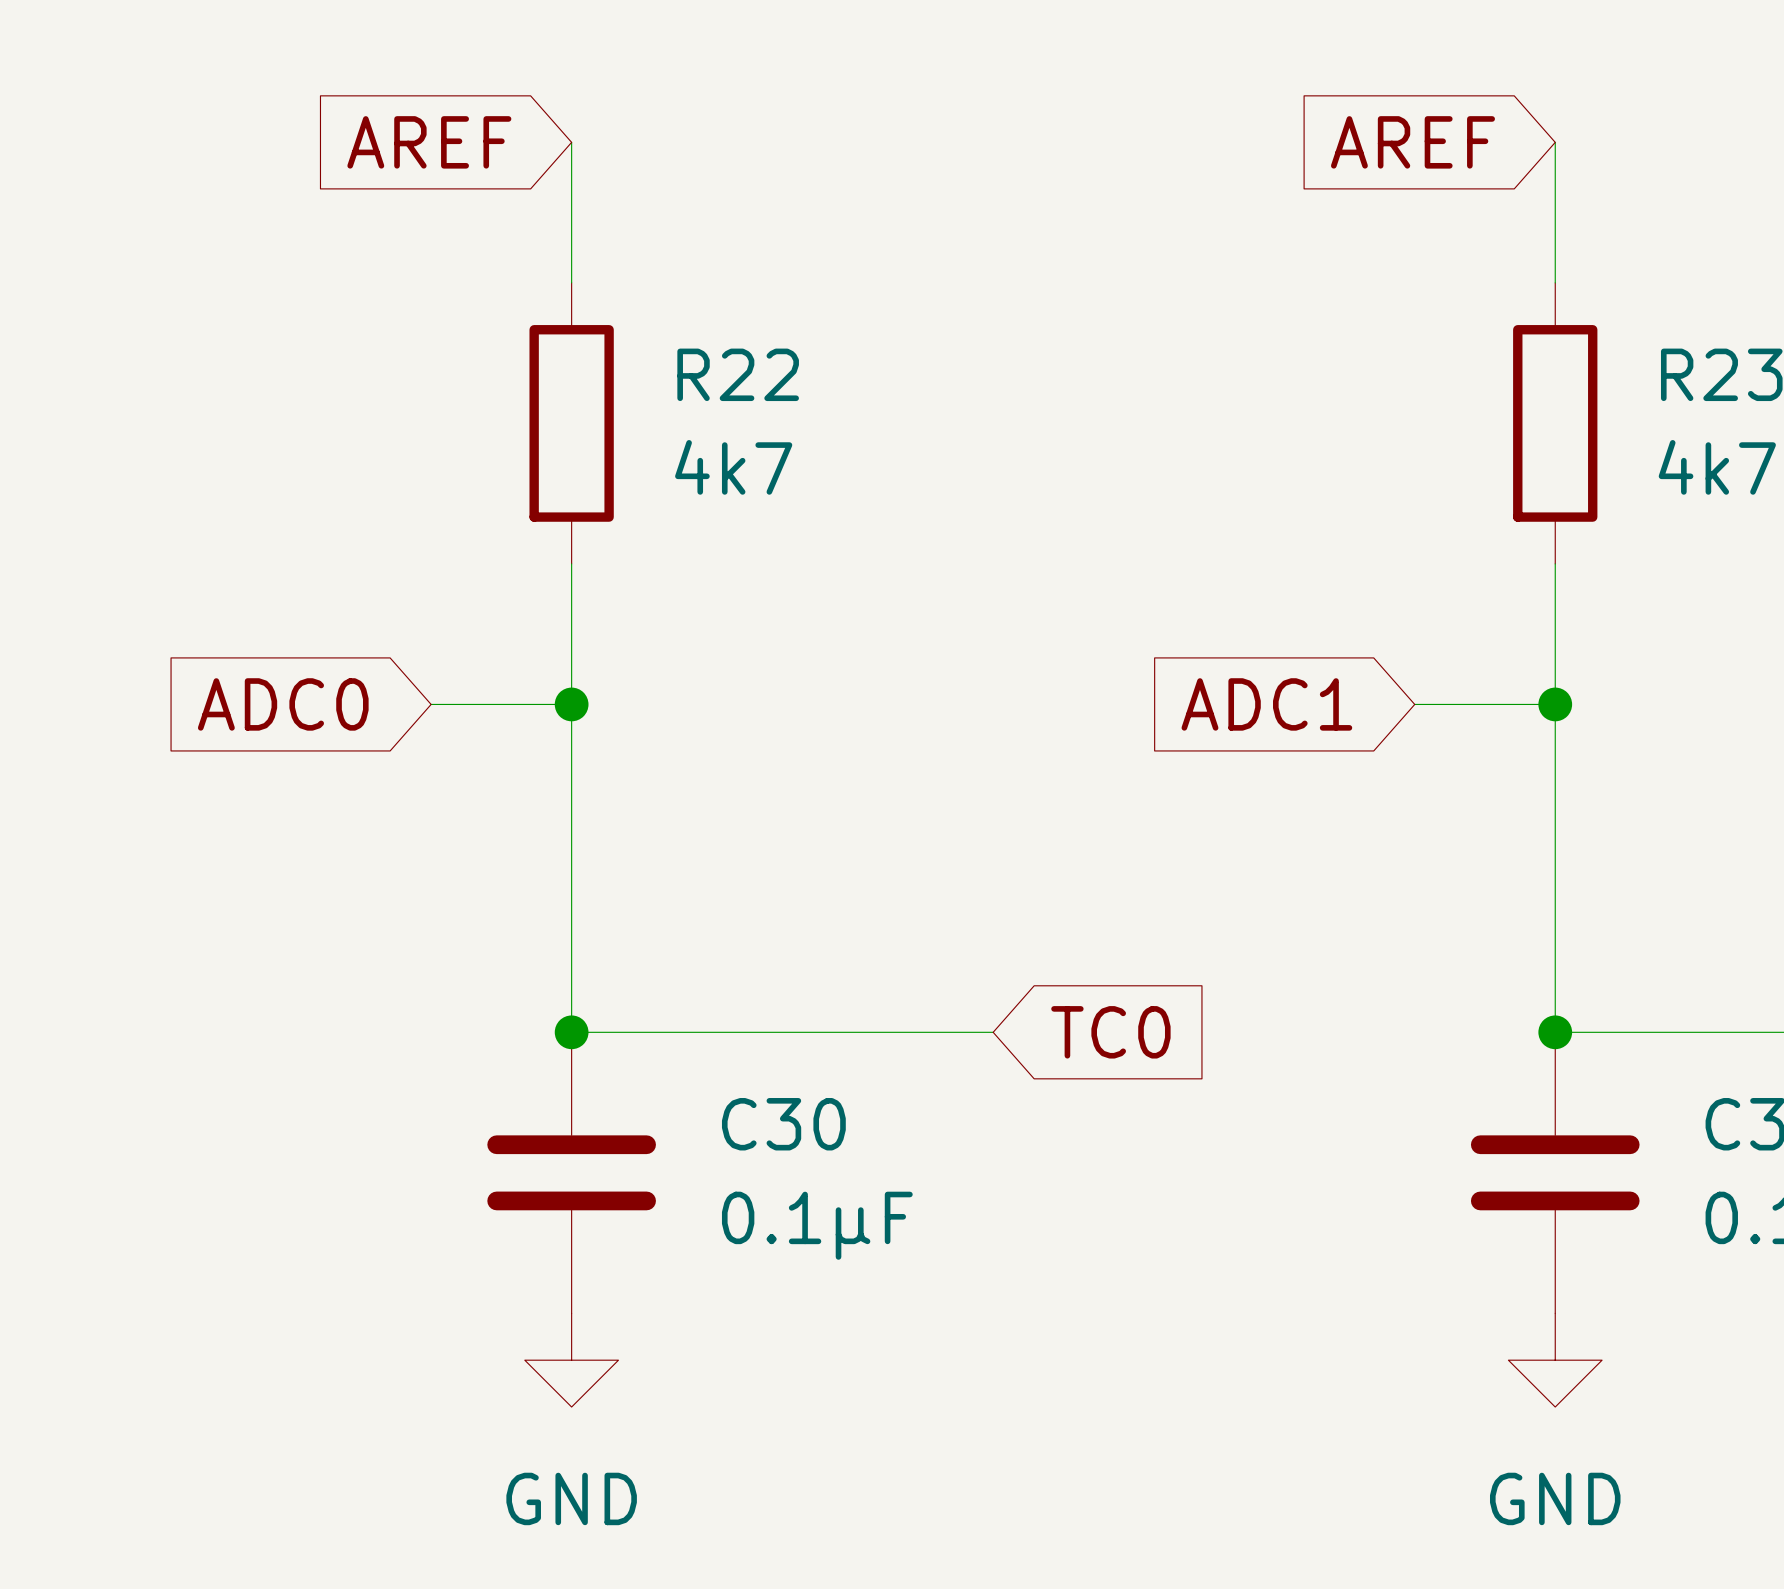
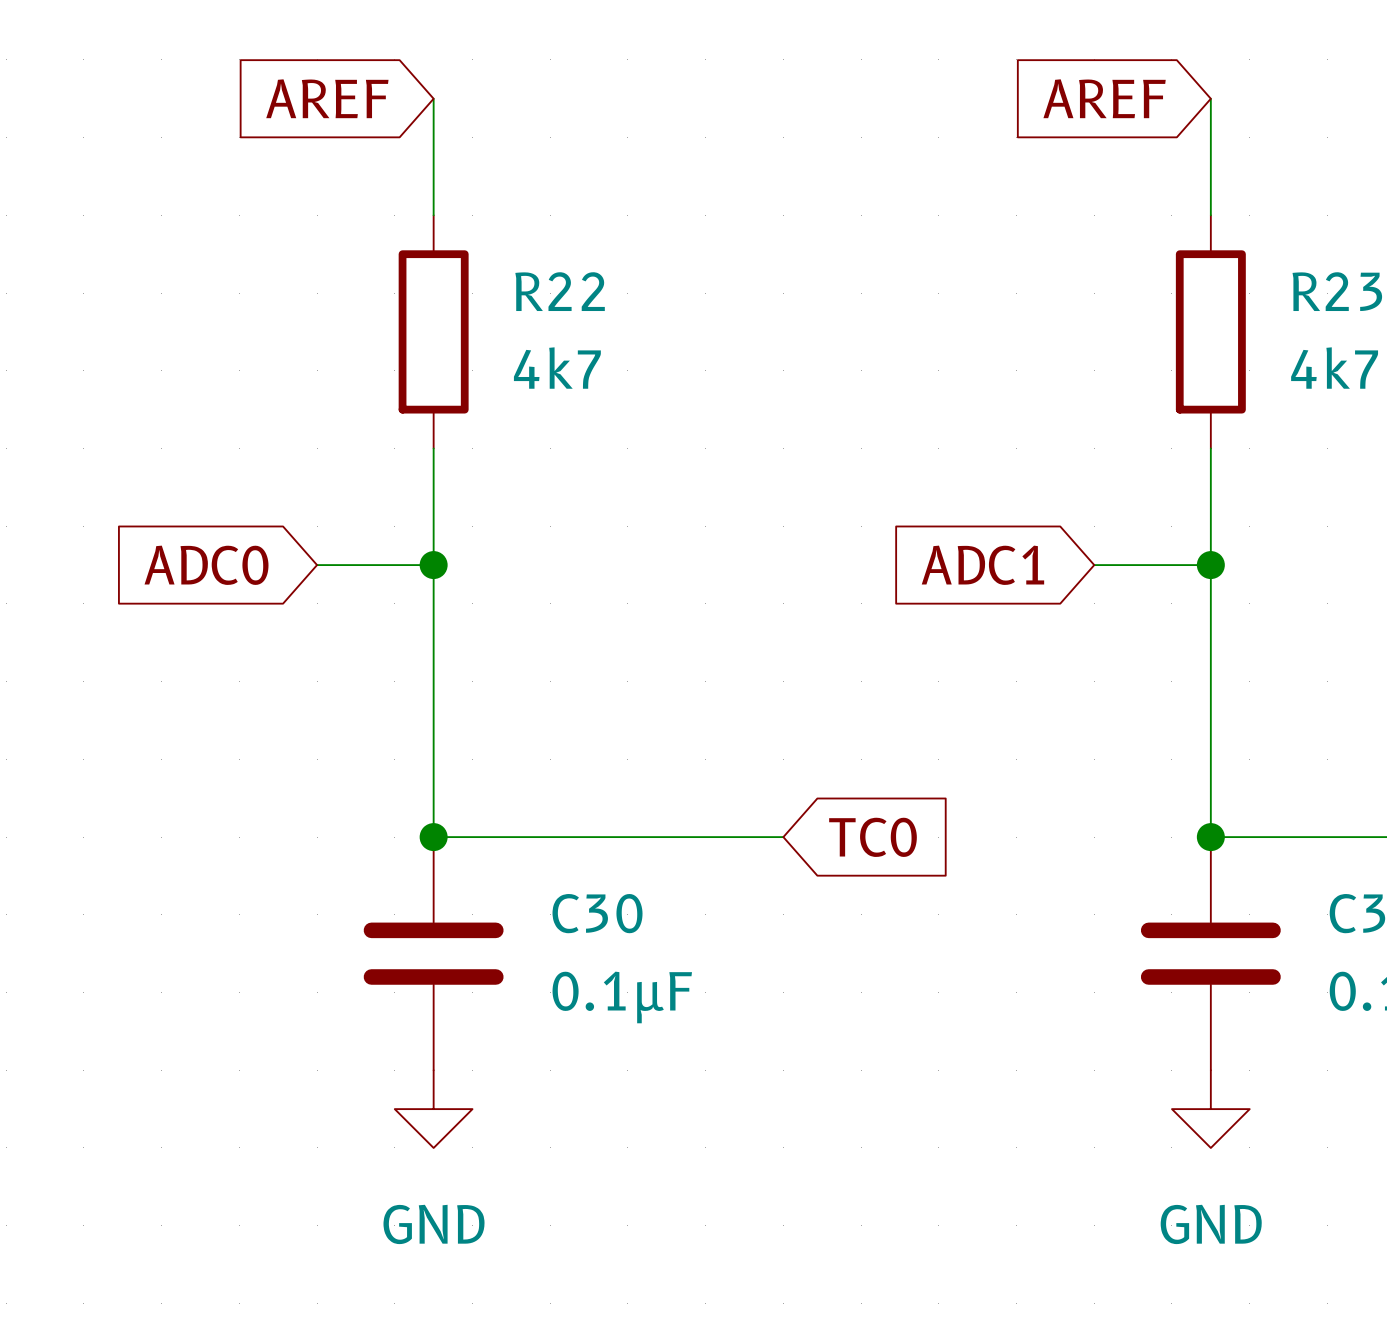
global label position: AREF (429, 142) -> AREF (327, 98)
wire: (571, 142) (571, 282) -> (433, 98) (433, 215)
R22 position: (571, 423) -> (433, 331)
wire: (571, 563) (571, 1032) (618, 1032) -> (433, 448) (433, 837)
global label position: ADC0 (283, 704) -> ADC0 (206, 565)
wire: (431, 704) (477, 704) -> (394, 565) (433, 565)
junction position: (571, 704) -> (433, 565)
junction position: (571, 1032) -> (433, 837)
wire: none -> (744, 837) (783, 837)
global label position: TC0 (1110, 1032) -> TC0 (872, 837)
C30 position: (571, 1172) -> (433, 953)
power symbol position: GND (571, 1360) -> GND (433, 1109)

